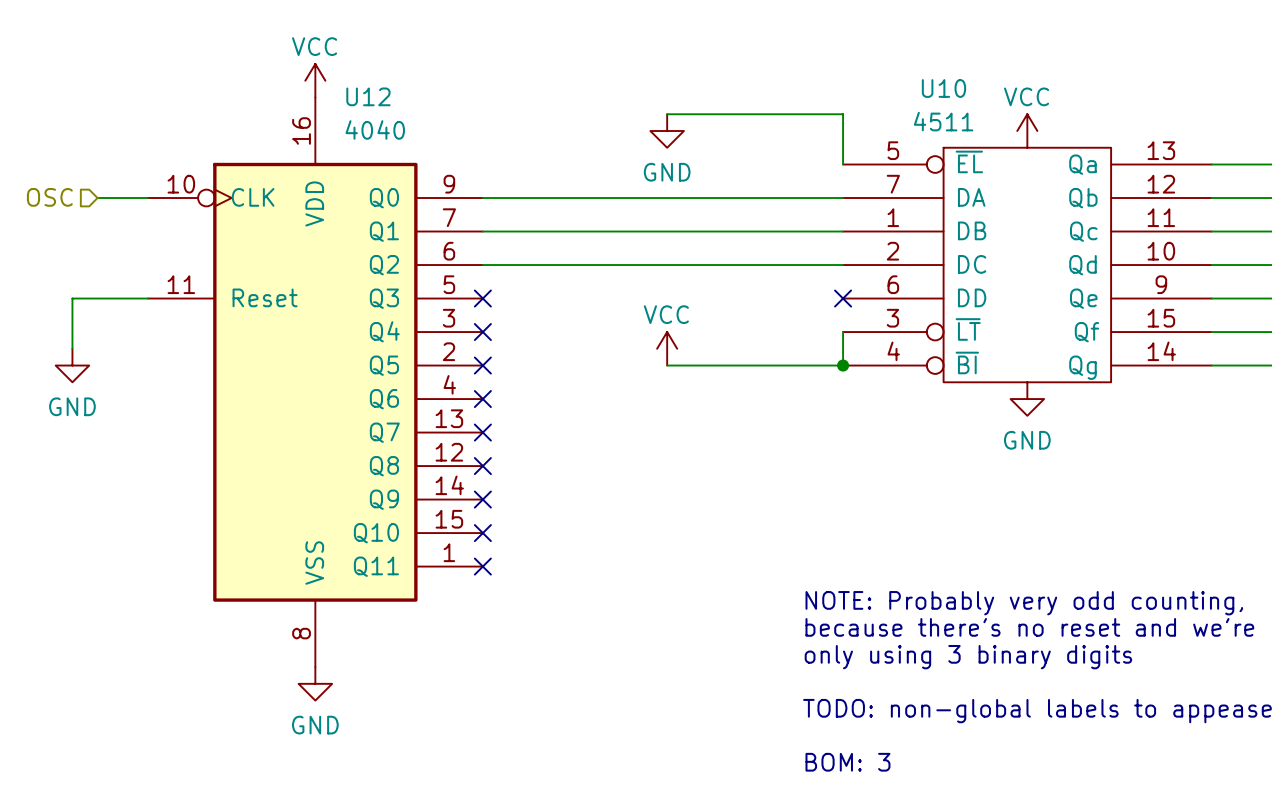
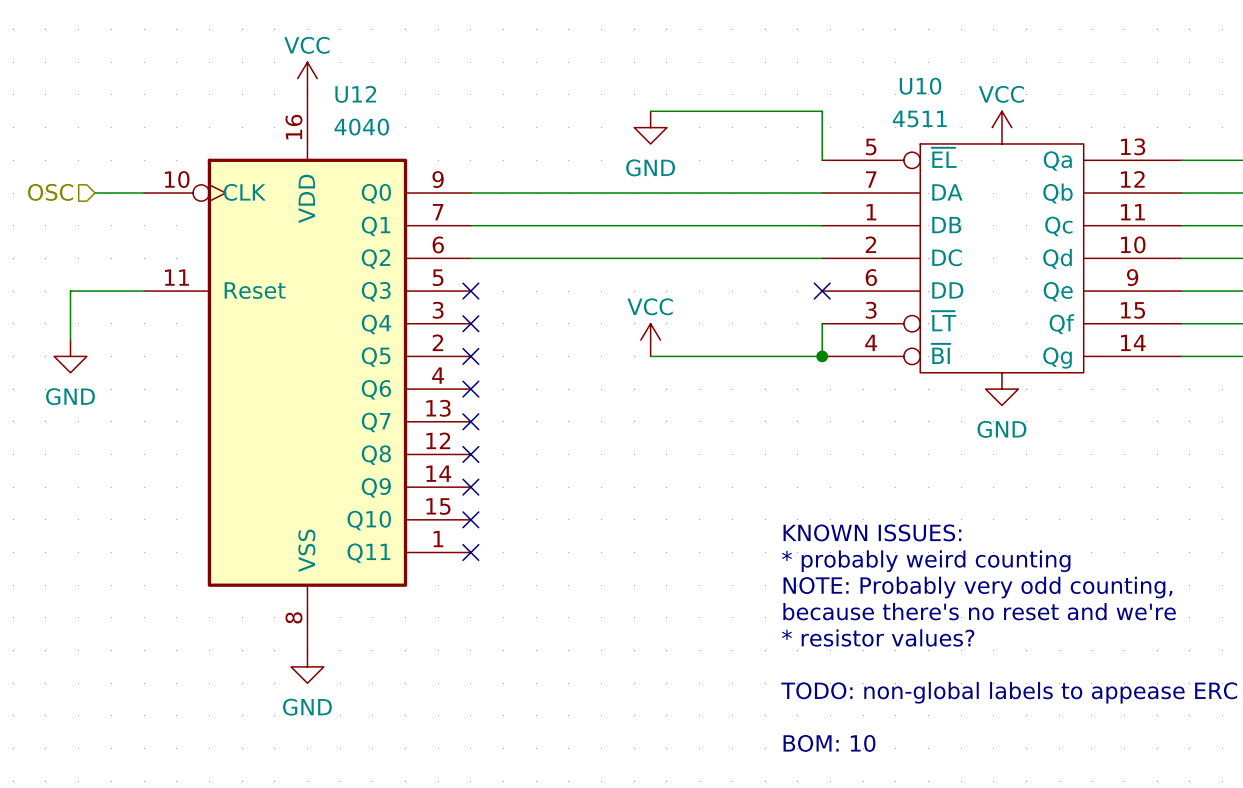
text: none -> KNOWN ISSUES: (872, 532)
text: none -> * probably weird counting (926, 561)
text: only using 3 binary digits (968, 657) -> * resistor values? (878, 637)
text: BOM: 3 (847, 762) -> BOM: 10 (829, 743)

